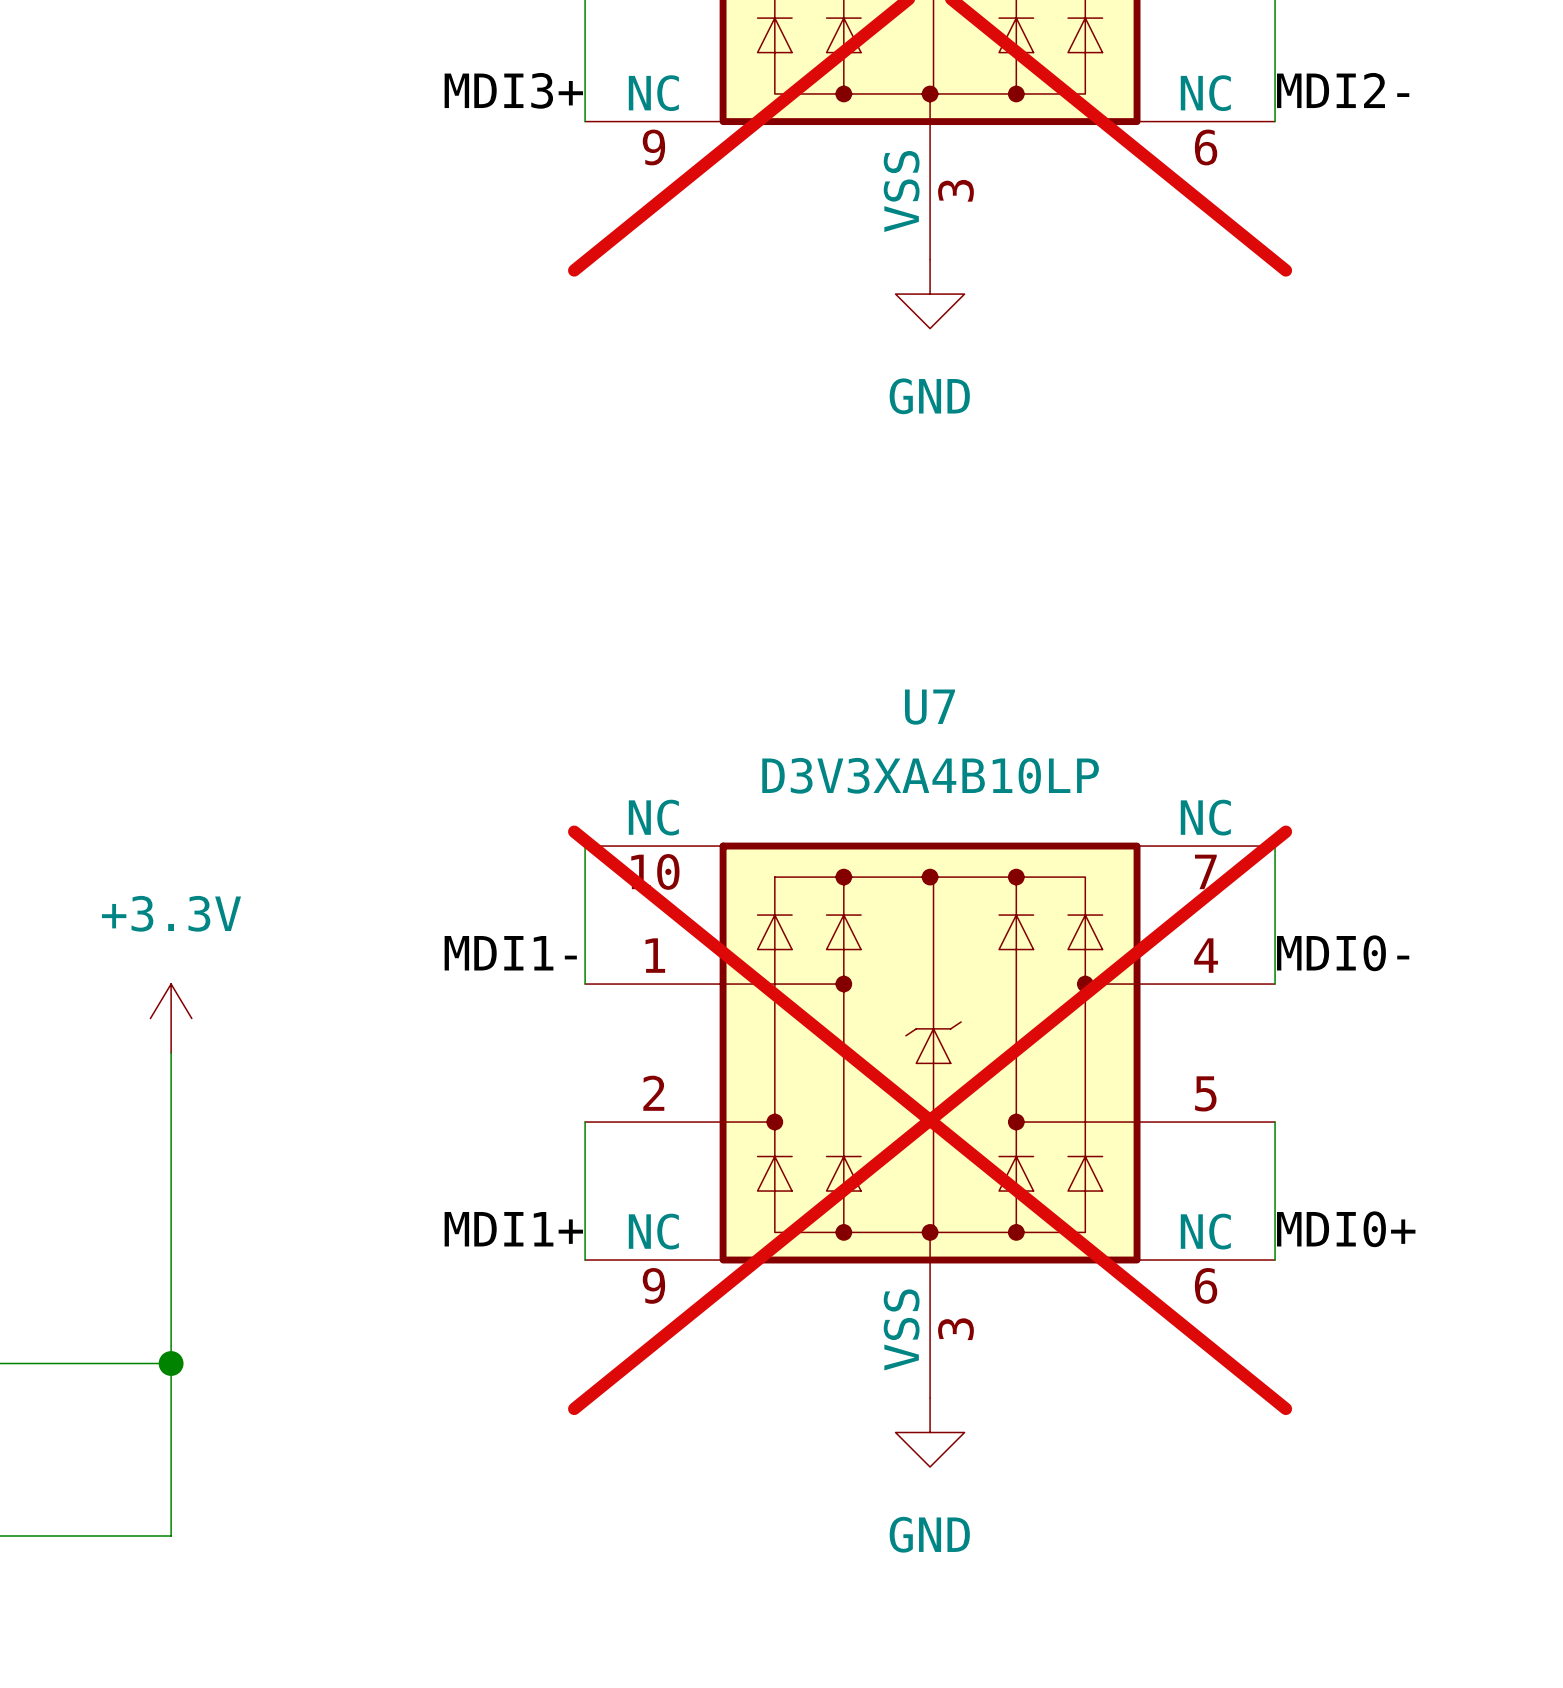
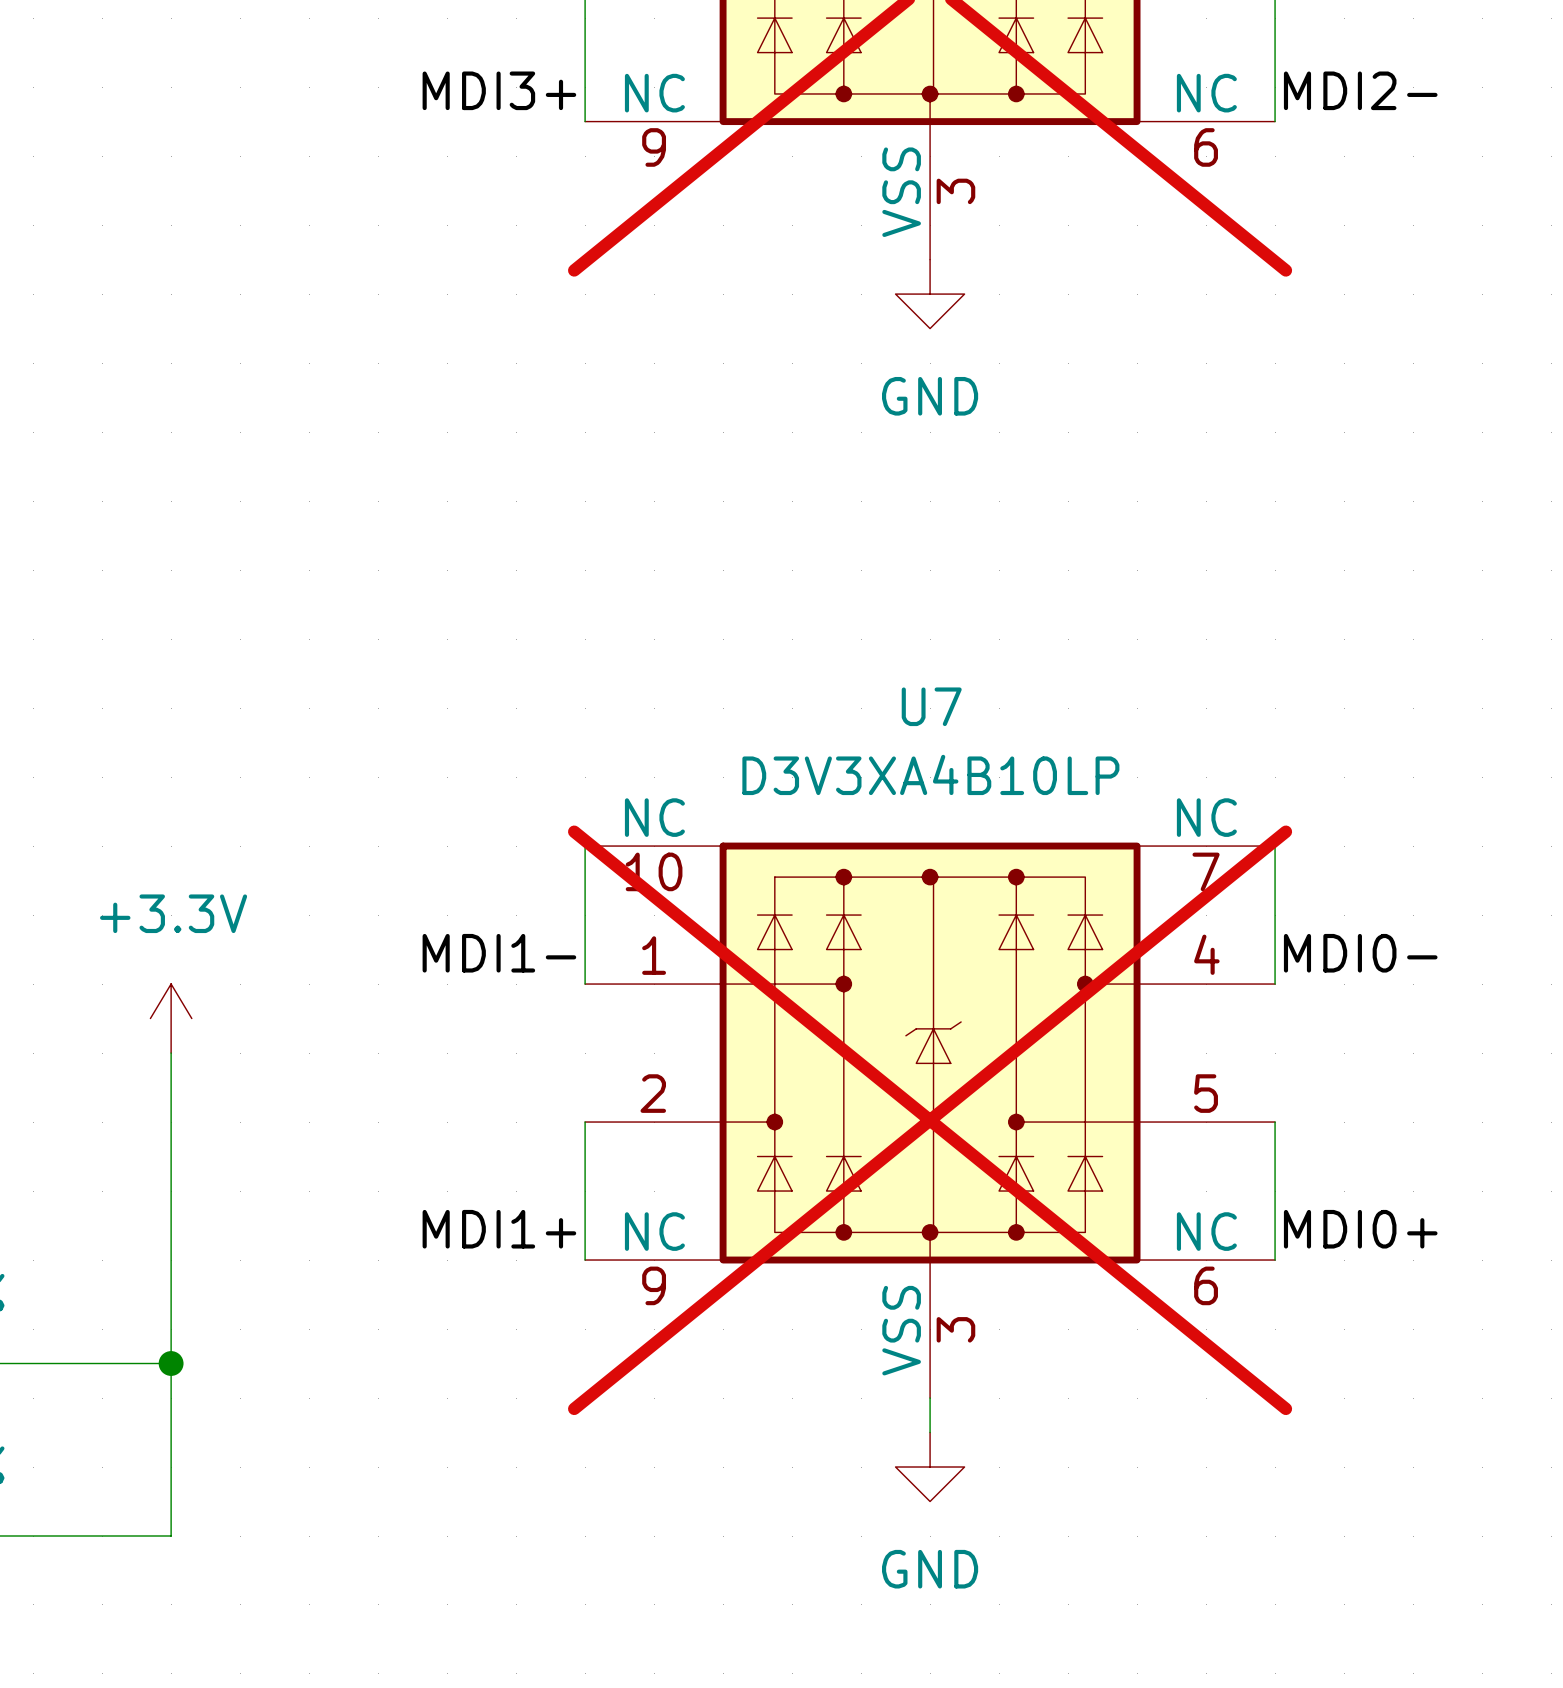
power symbol position: GND (930, 1432) -> GND (930, 1467)

